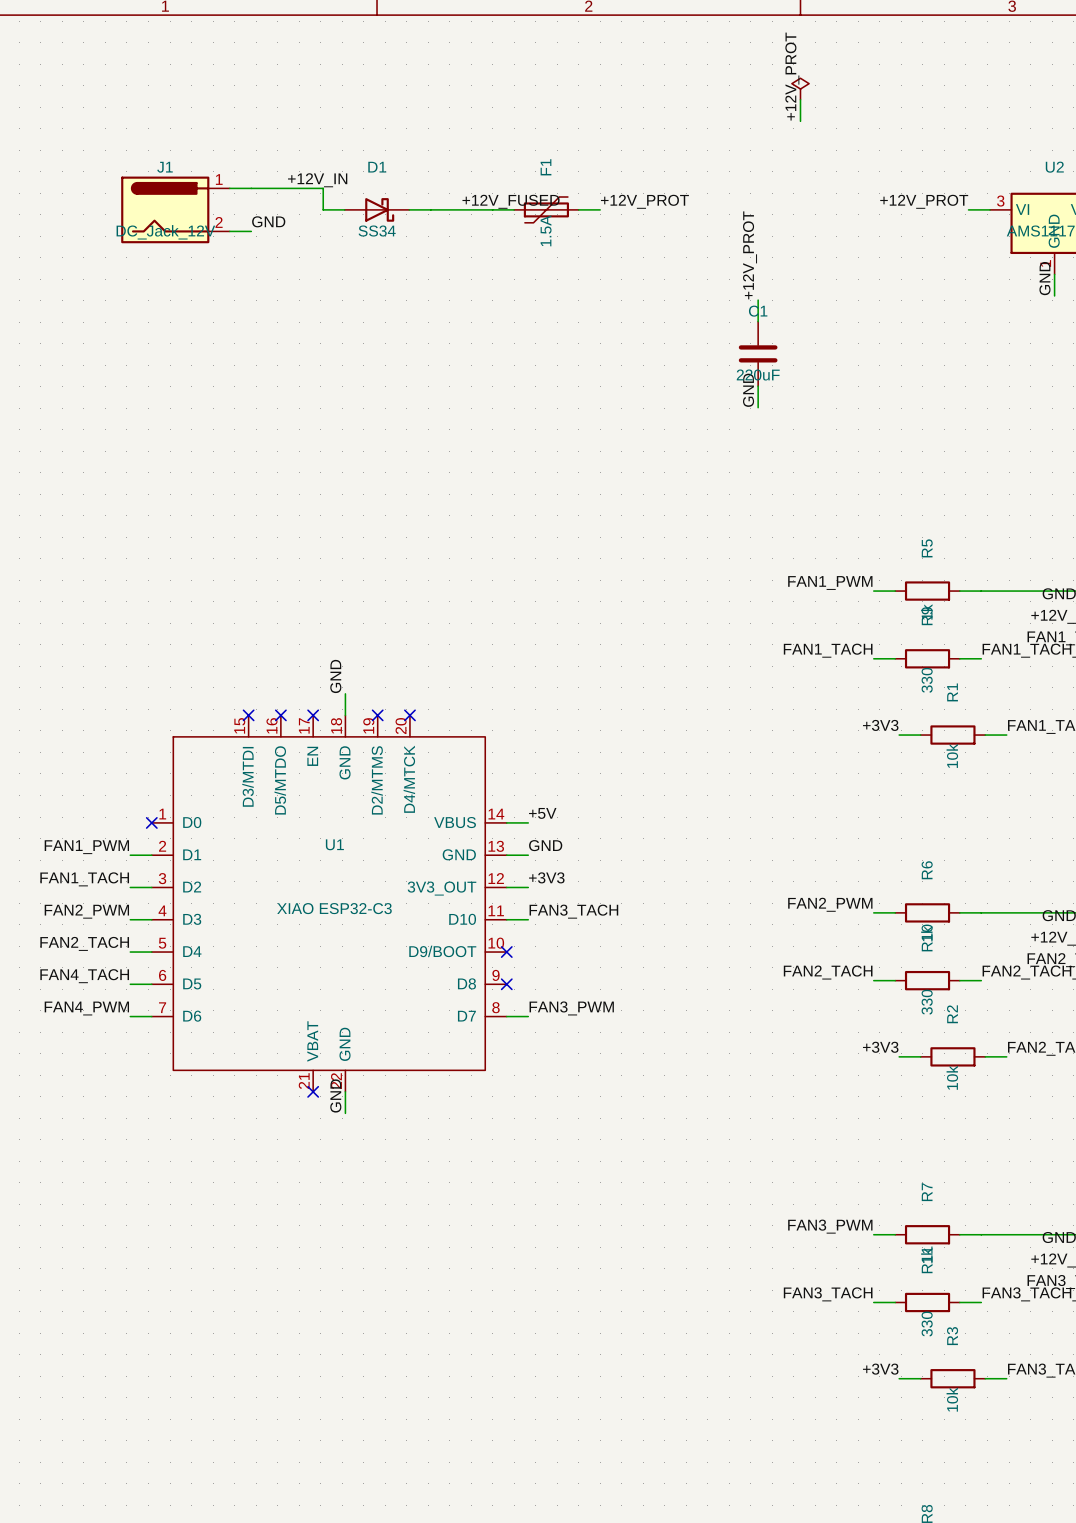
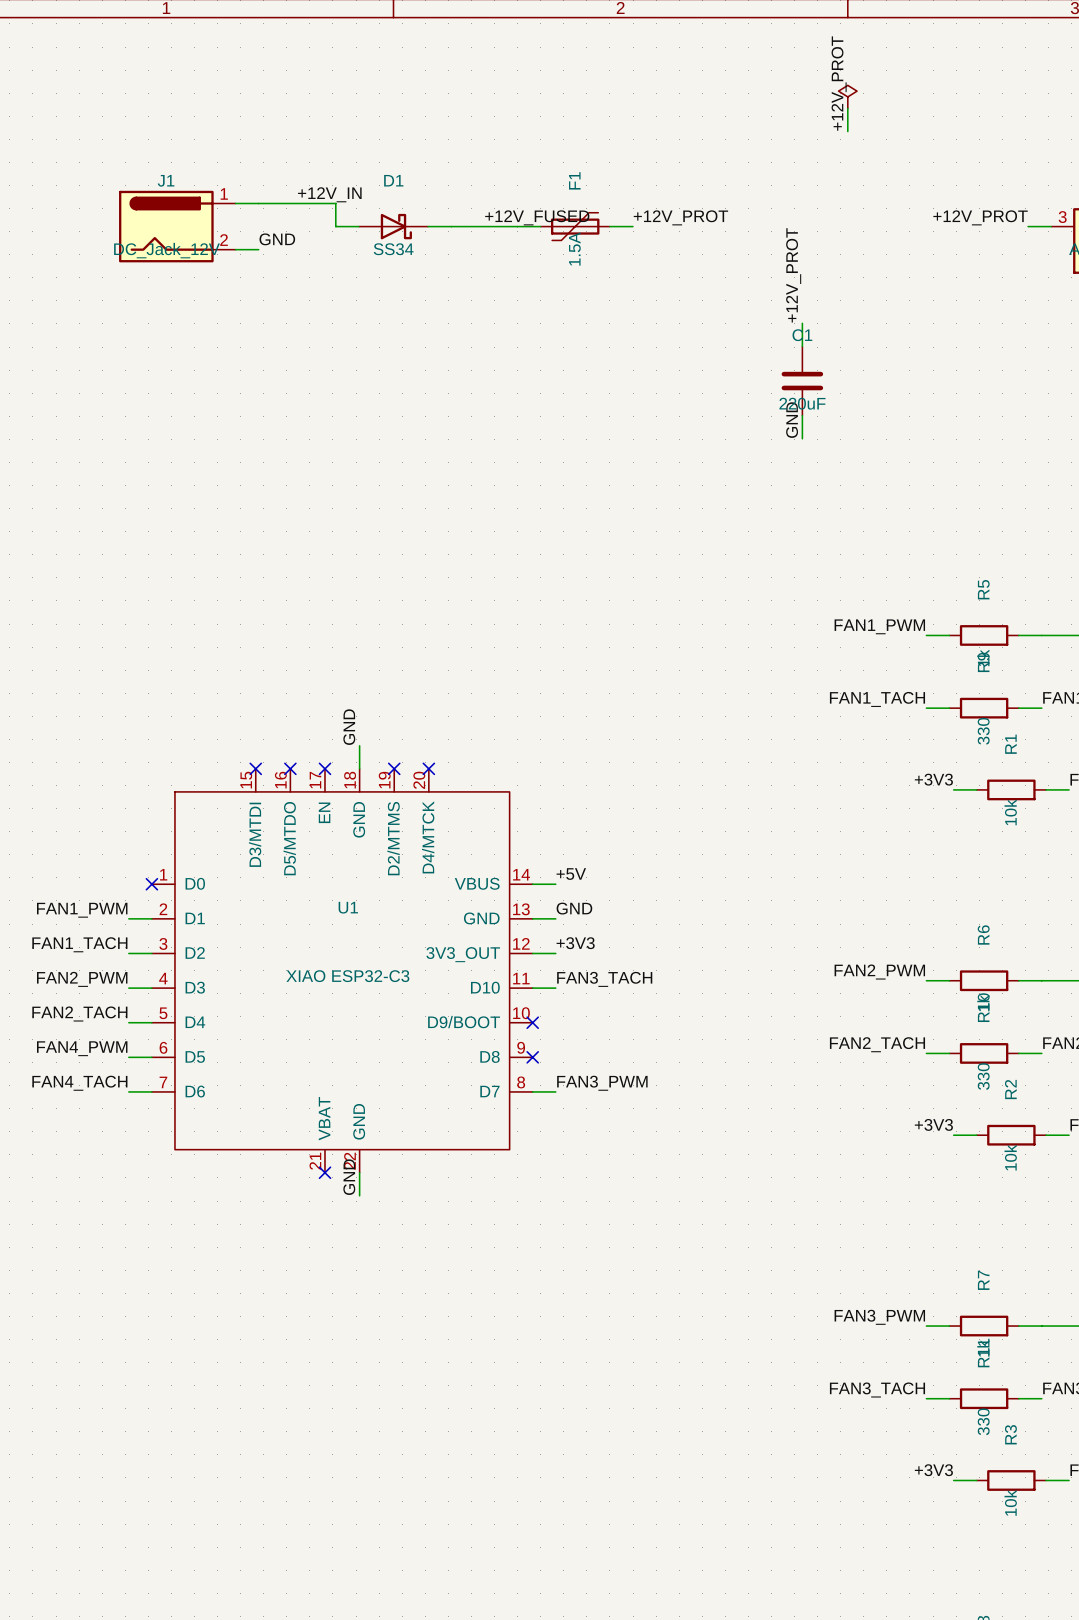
label: FAN4_TACH (84, 976) -> FAN4_PWM (82, 1048)
label: FAN4_PWM (86, 1008) -> FAN4_TACH (79, 1083)

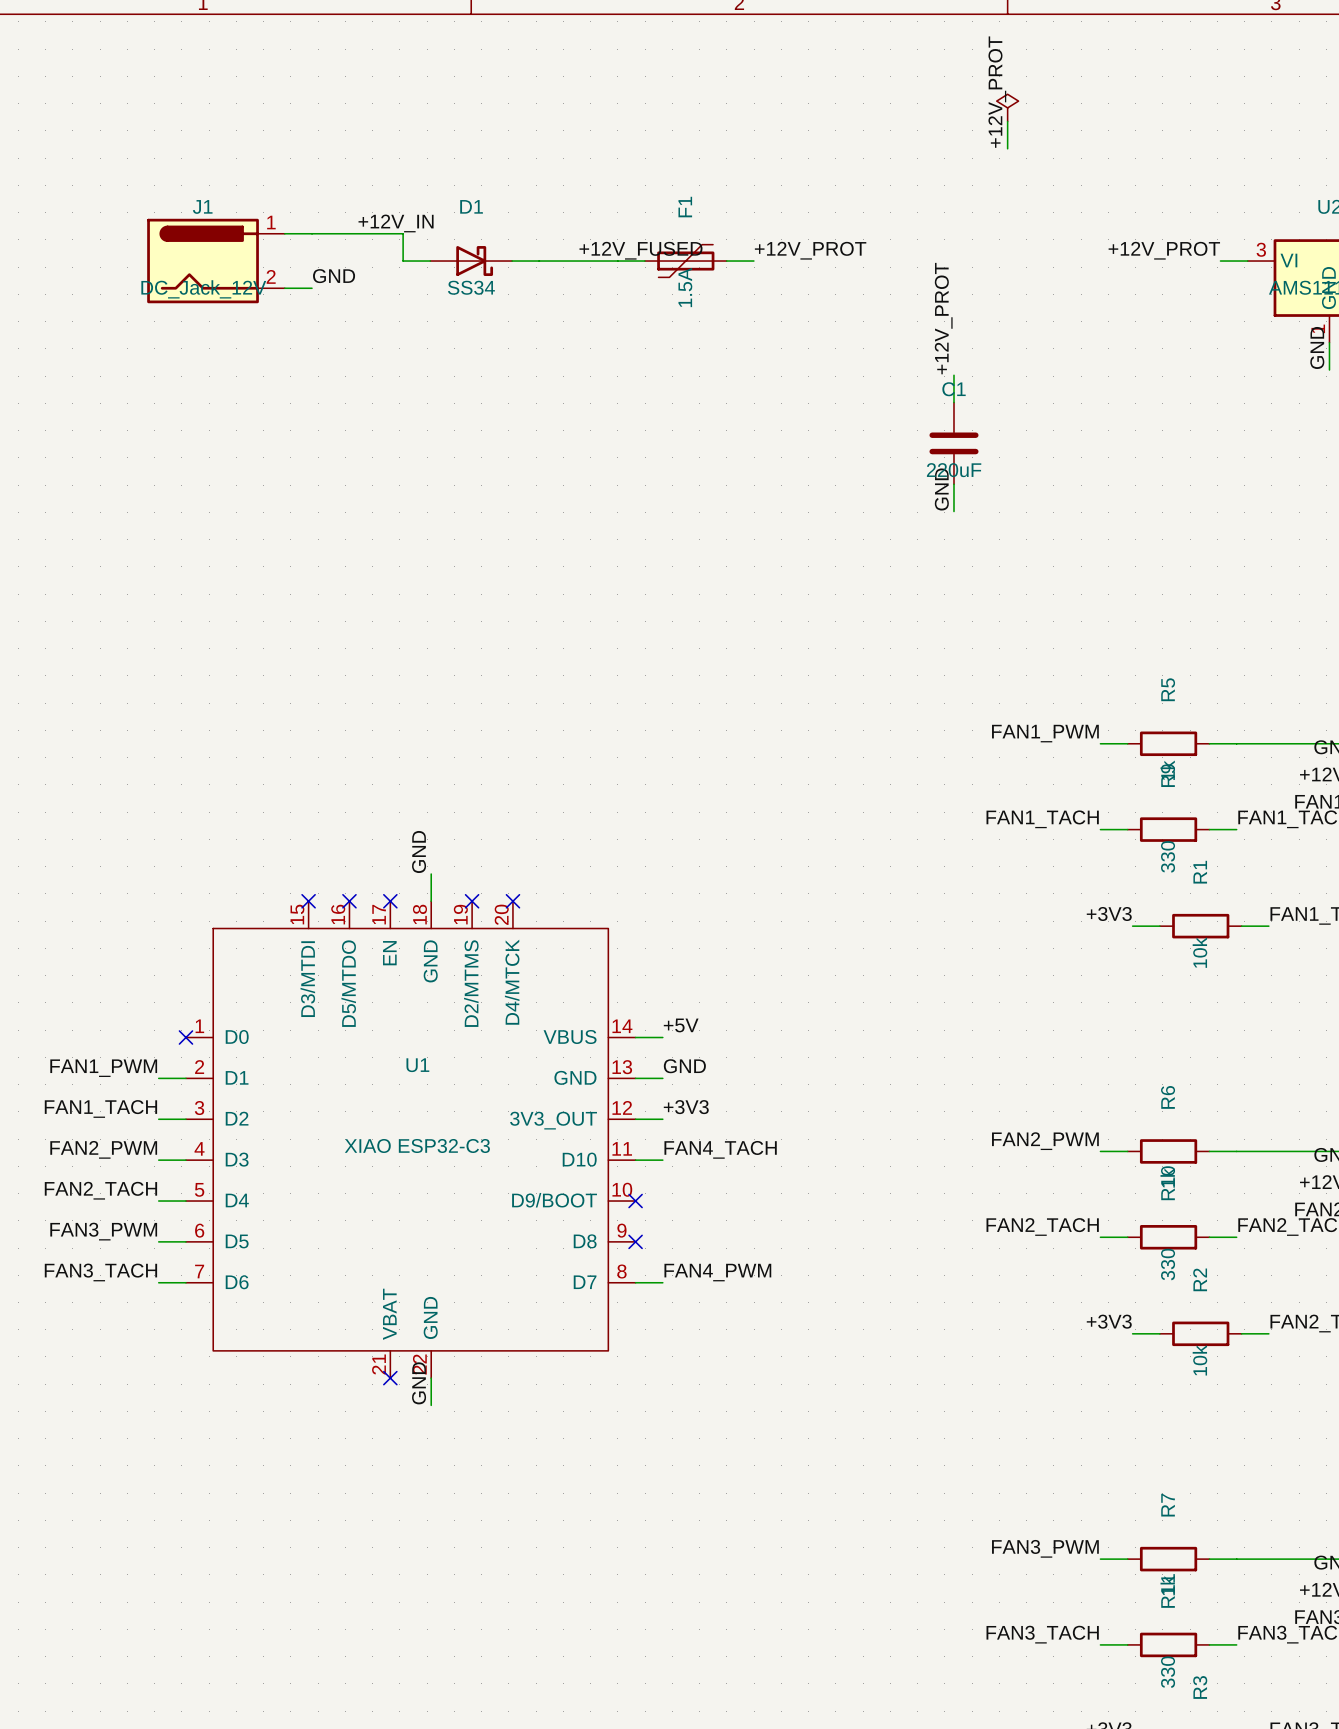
label: FAN3_TACH (604, 979) -> FAN4_TACH (720, 1149)
label: FAN4_PWM (82, 1048) -> FAN3_PWM (103, 1231)
label: FAN4_TACH (79, 1083) -> FAN3_TACH (100, 1272)
label: FAN3_PWM (602, 1083) -> FAN4_PWM (717, 1272)

